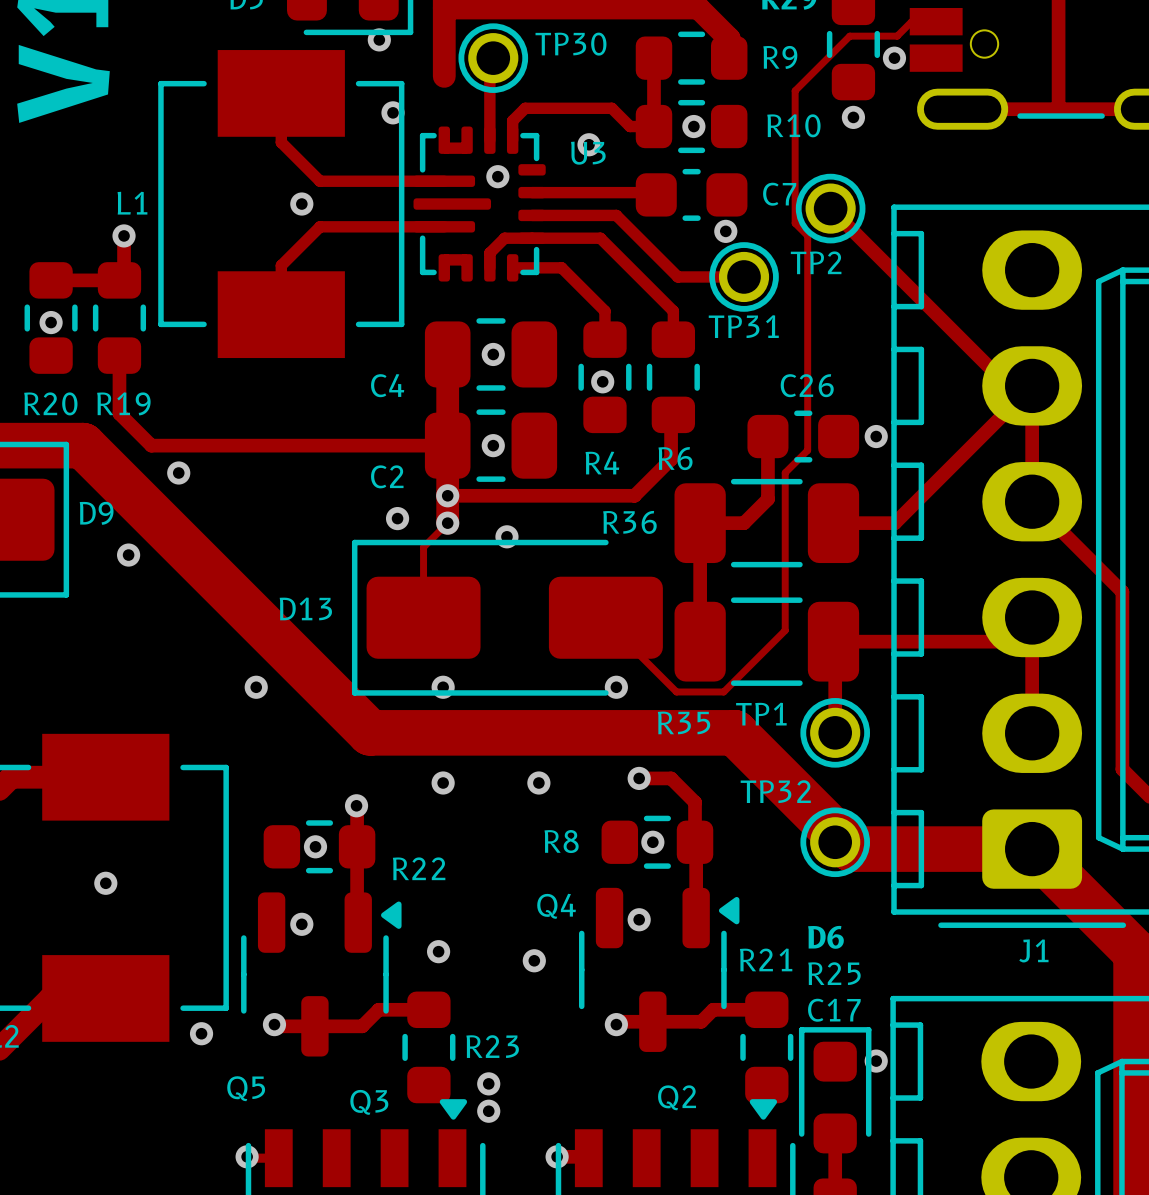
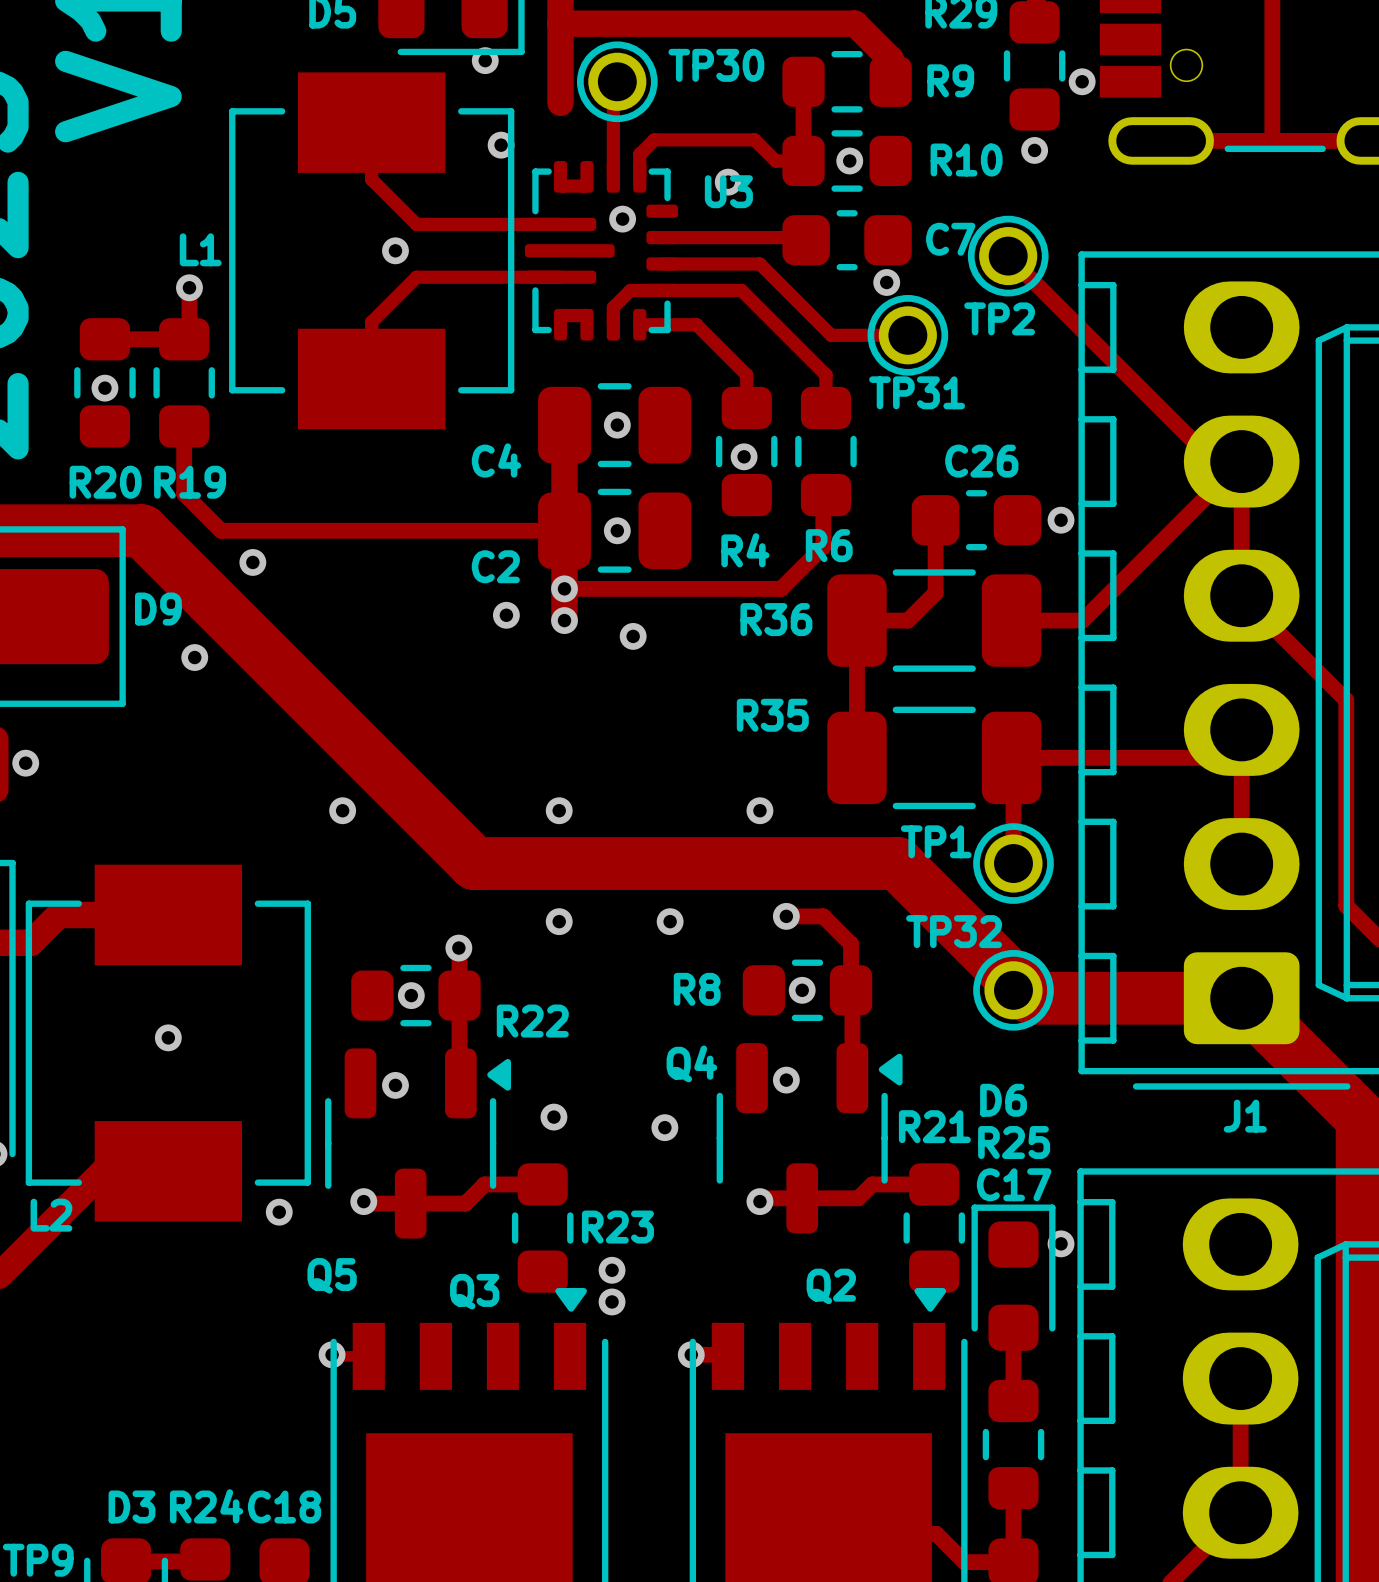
track: (936, 21) (911, 21) (897, 36) (849, 36) (795, 90) (795, 223) (807, 235) (807, 450) (785, 472) (785, 630) (723, 691) (676, 691) (605, 621) (605, 617) -> none
track: (447, 523) (423, 547) (423, 617) -> none
D13: (507, 617) -> none
R35 name position: R35 (684, 722) -> R35 (772, 715)

